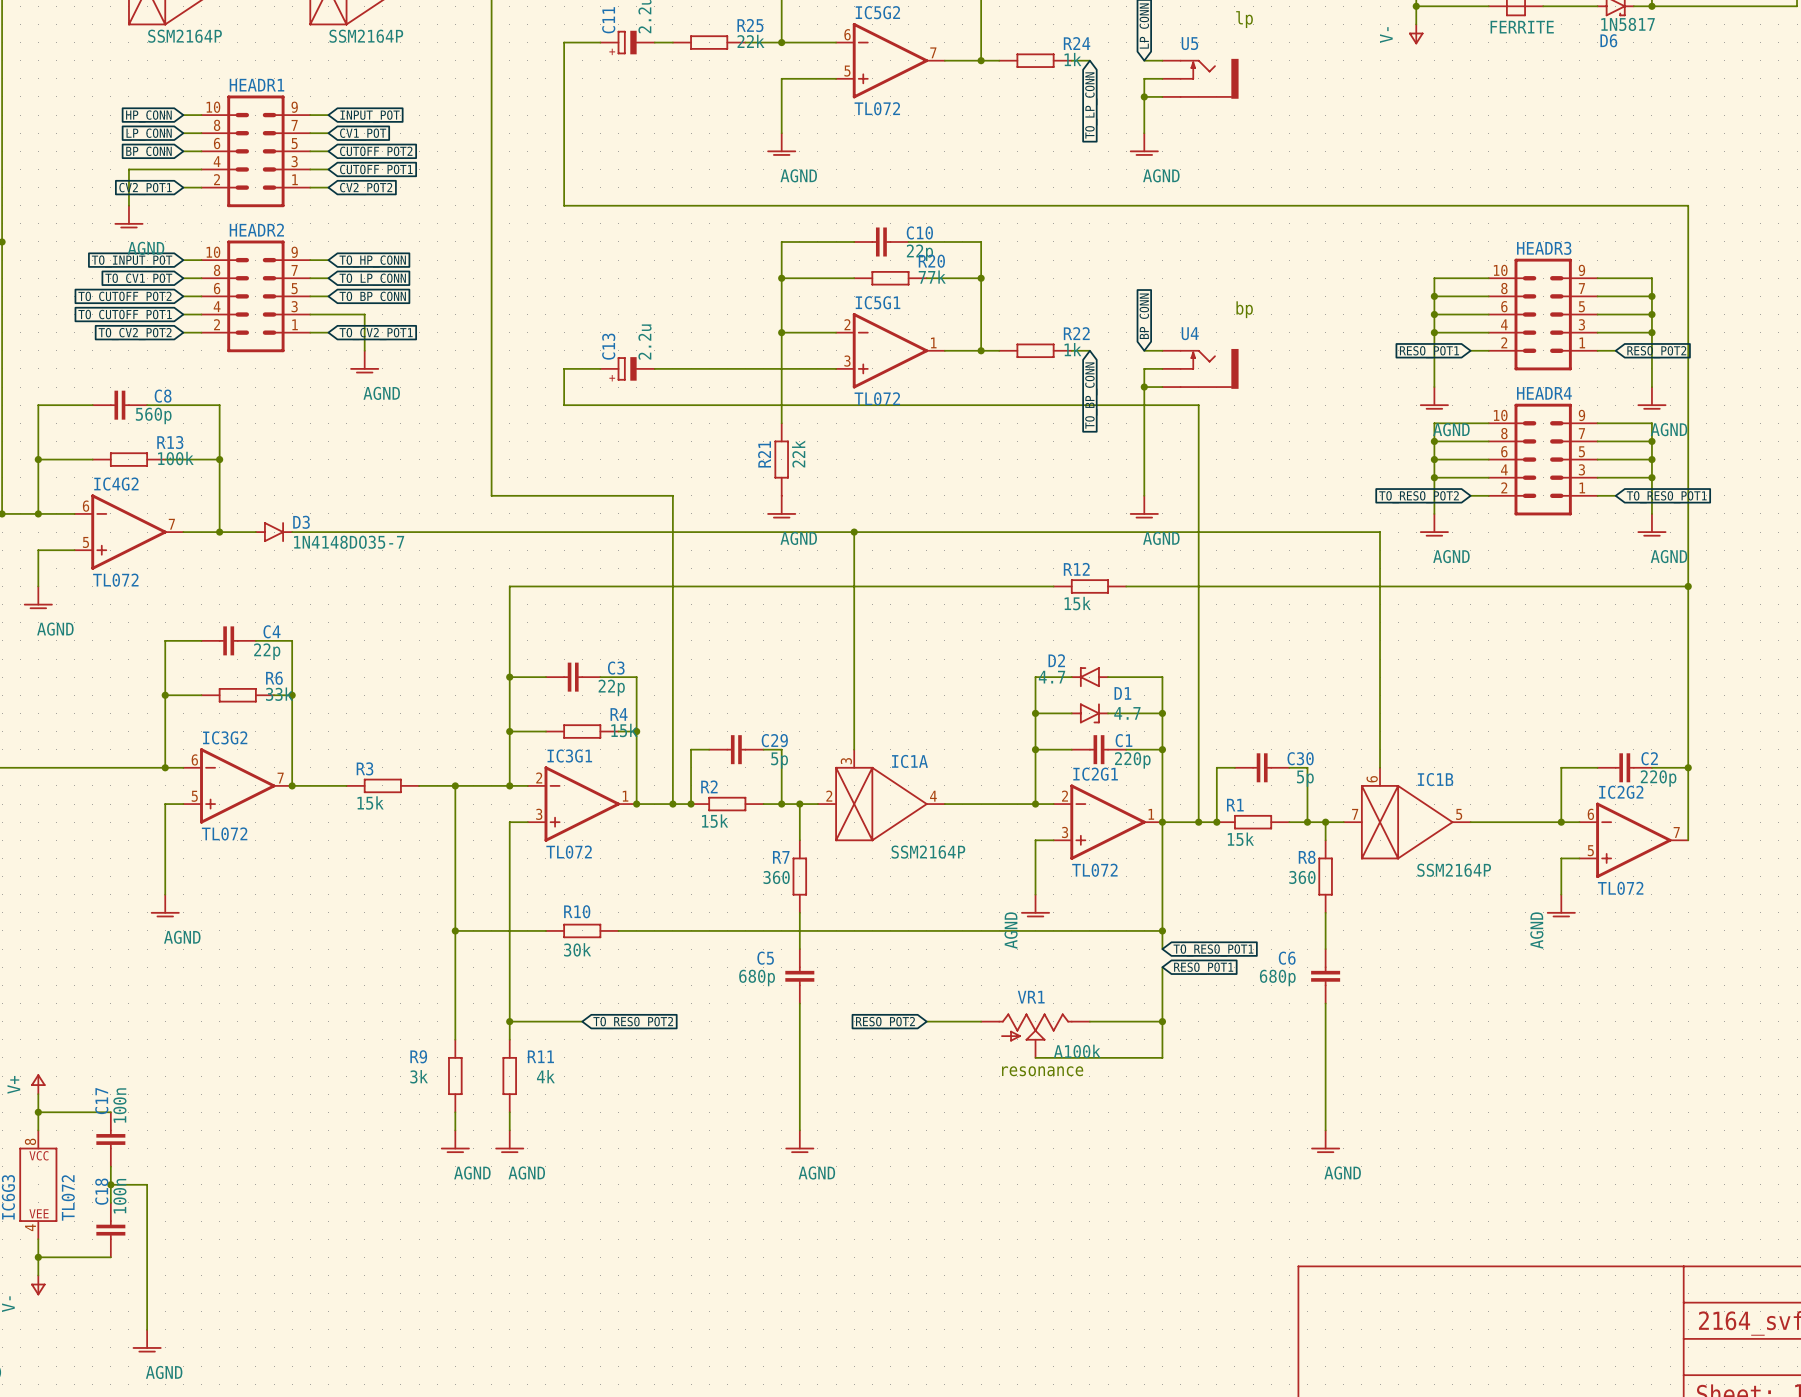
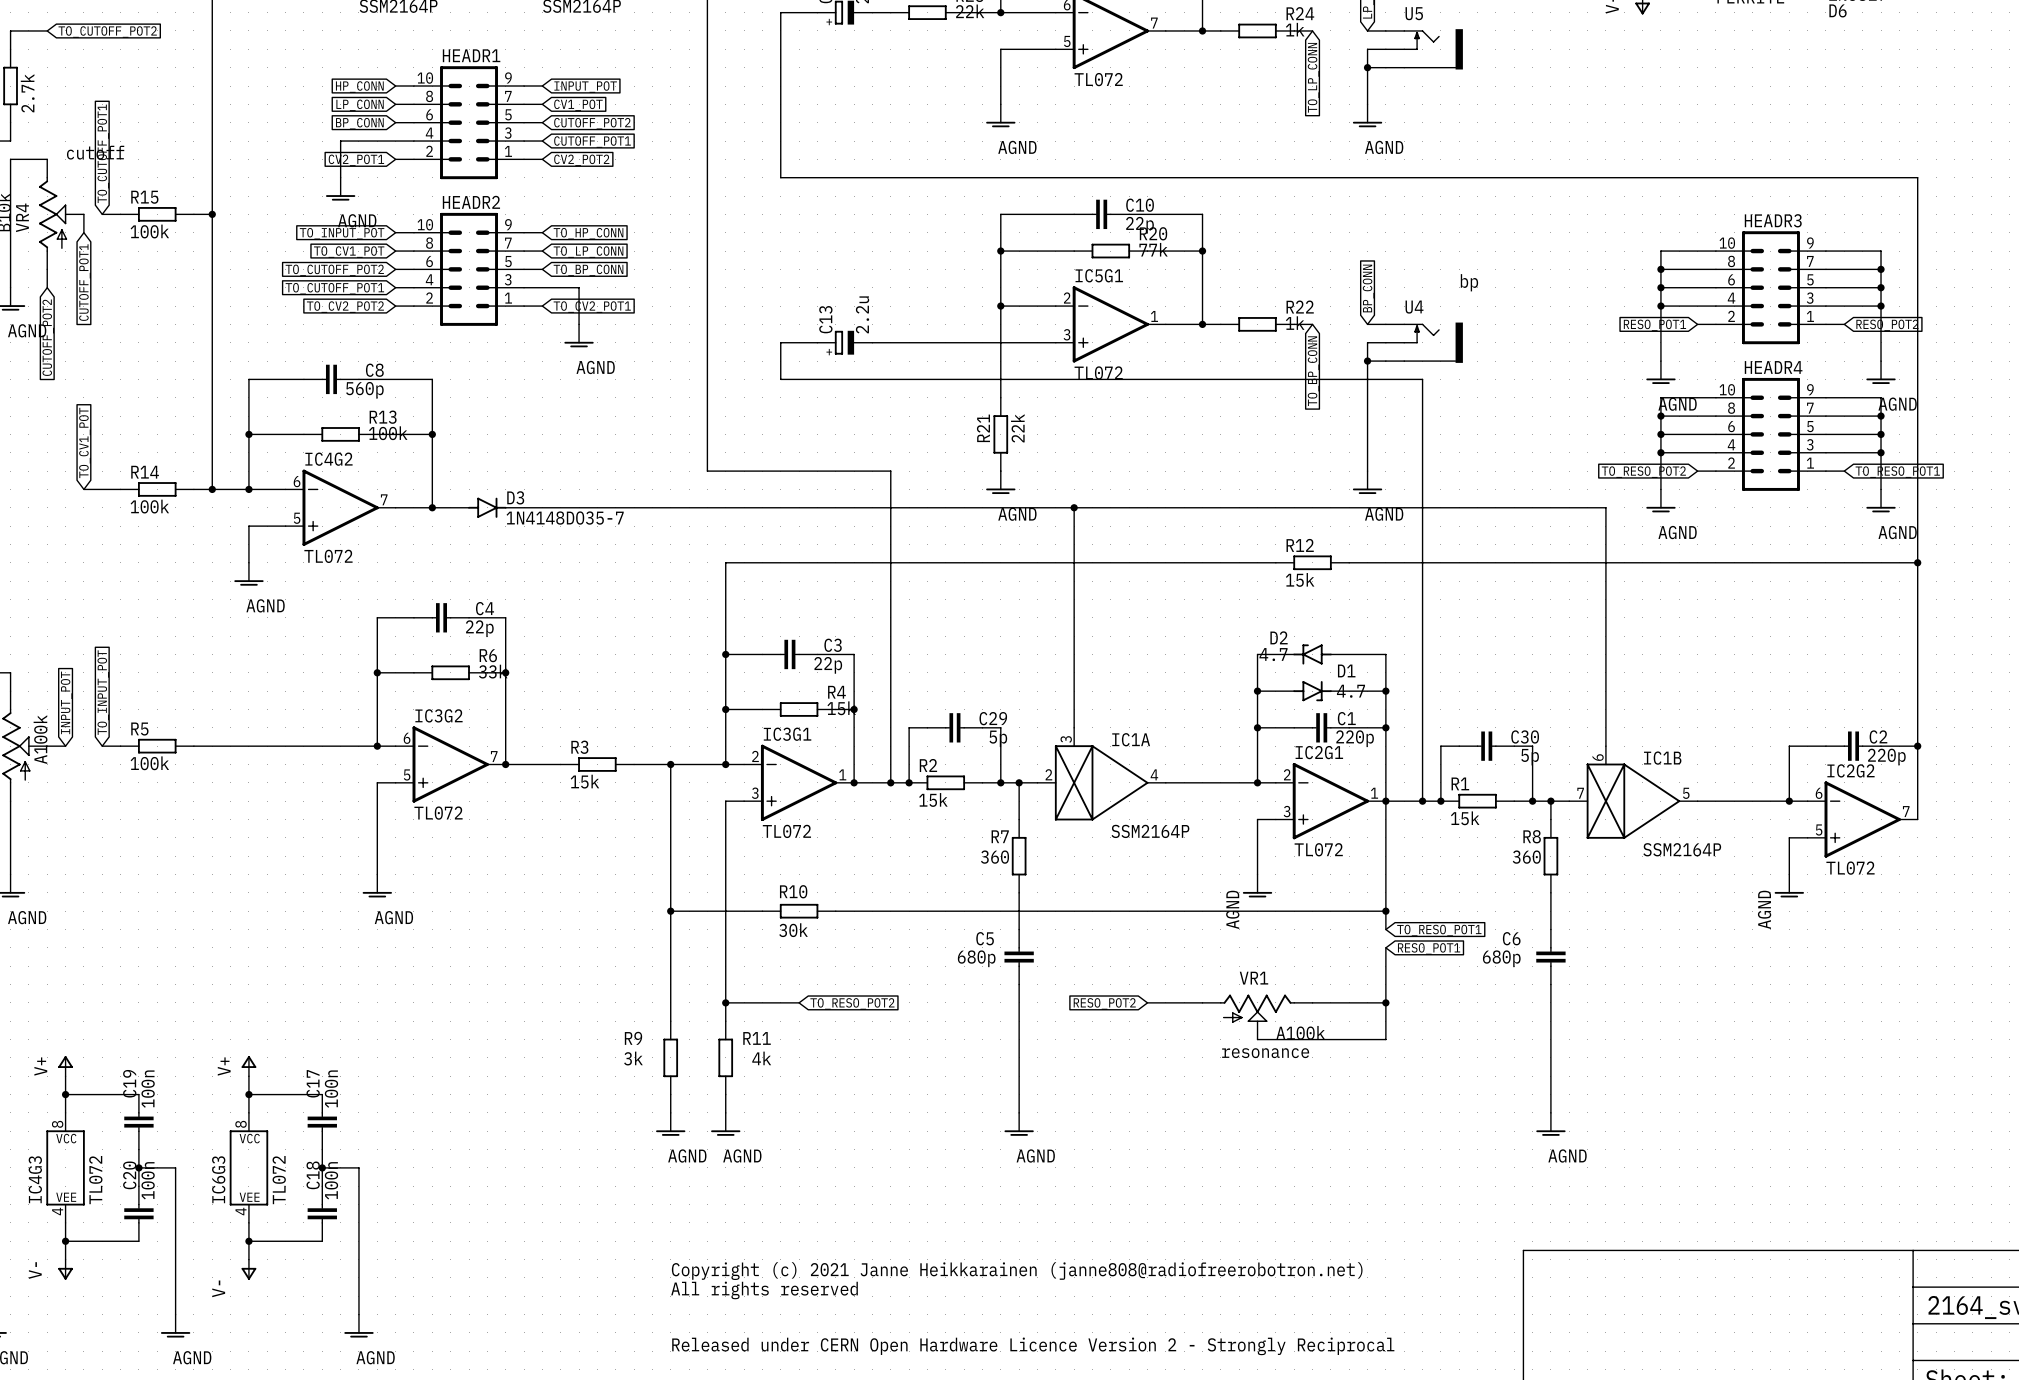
text: none -> Copyright (c) 2021 Janne Heikkarainen (janne808@radiofreerobotron.net) (1017, 1271)
text: none -> All rights reserved (764, 1290)
text: none -> Released under CERN Open Hardware Licence Version 2 - Strongly Reciprocal (1033, 1346)

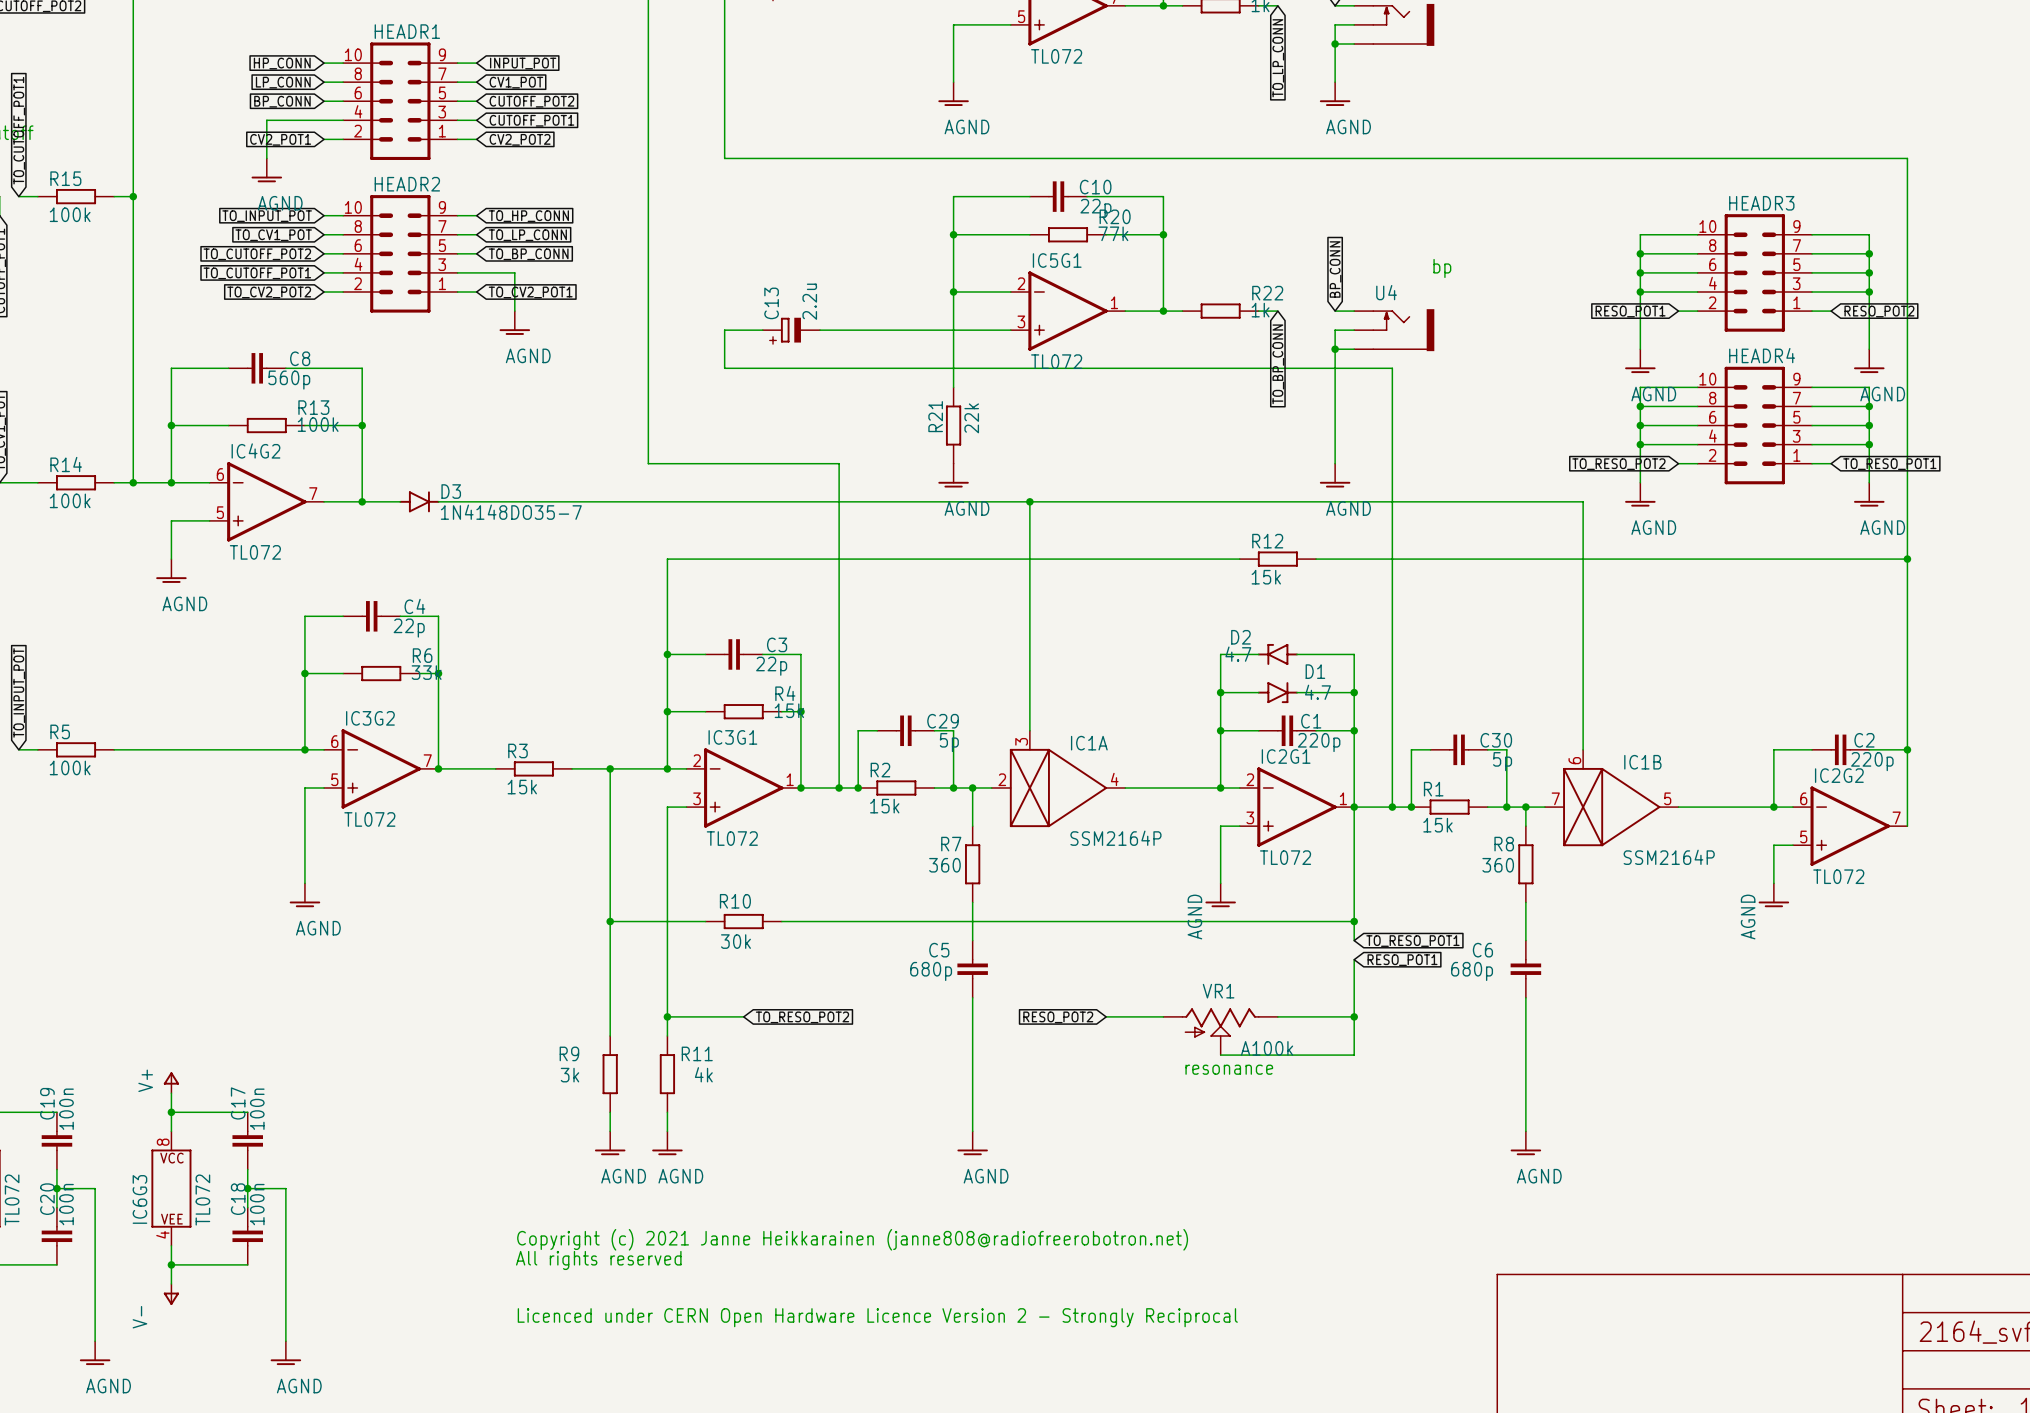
text position: Copyright (c) 2021 Janne Heikkarainen (janne808@radiofreerobotron.net) (1017, 1271) -> Copyright (c) 2021 Janne Heikkarainen (janne808@radiofreerobotron.net) (852, 1239)
text position: All rights reserved (764, 1290) -> All rights reserved (598, 1260)
text: none -> Licenced under CERN Open Hardware Licence Version 2 - Strongly Reciprocal (877, 1317)
text: Released under CERN Open Hardware Licence Version 2 - Strongly Reciprocal (1033, 1346) -> none

